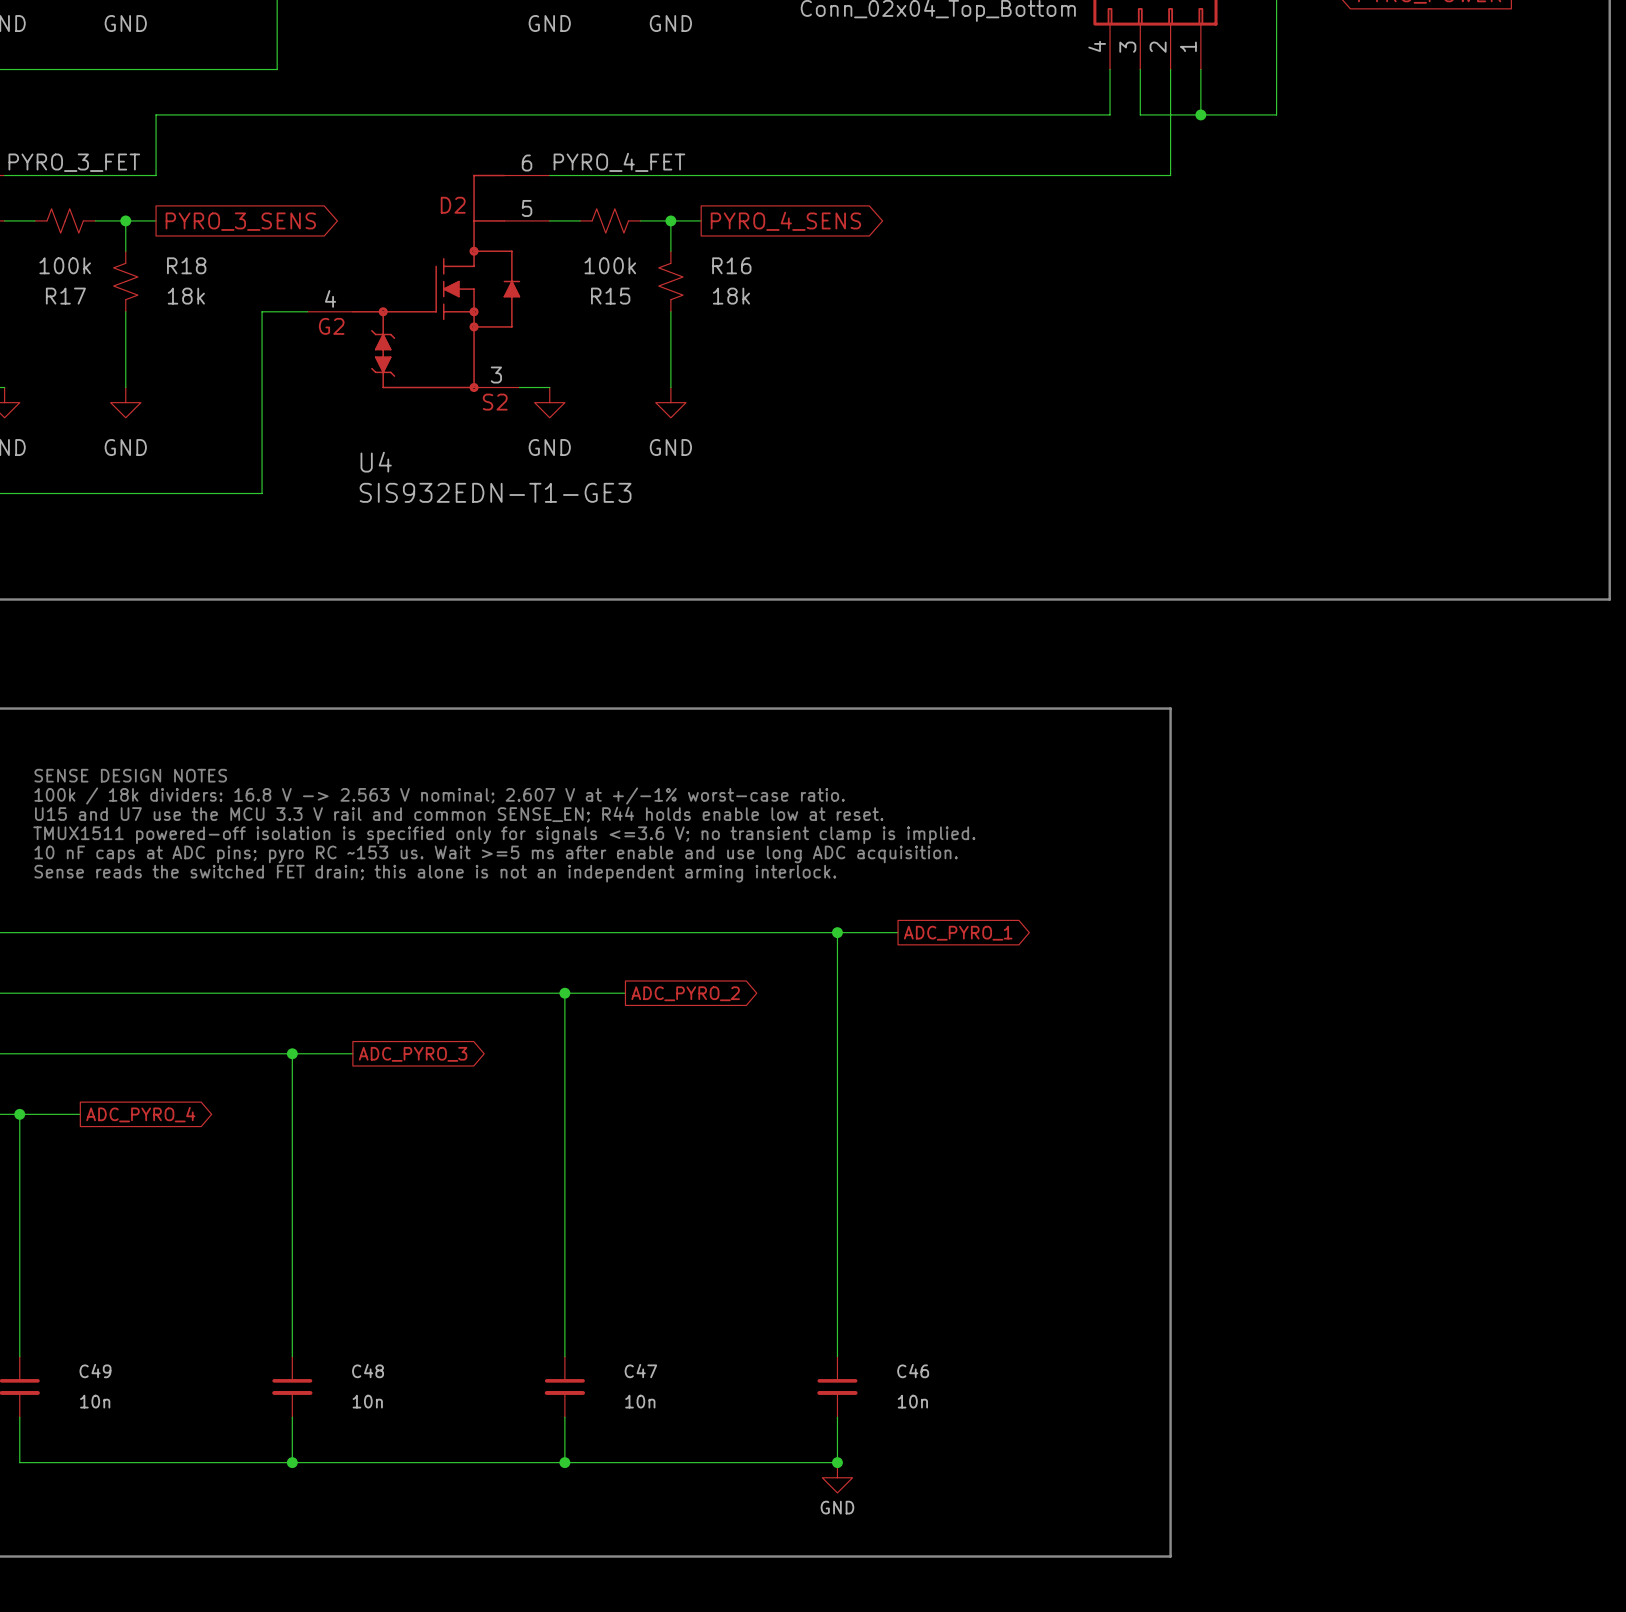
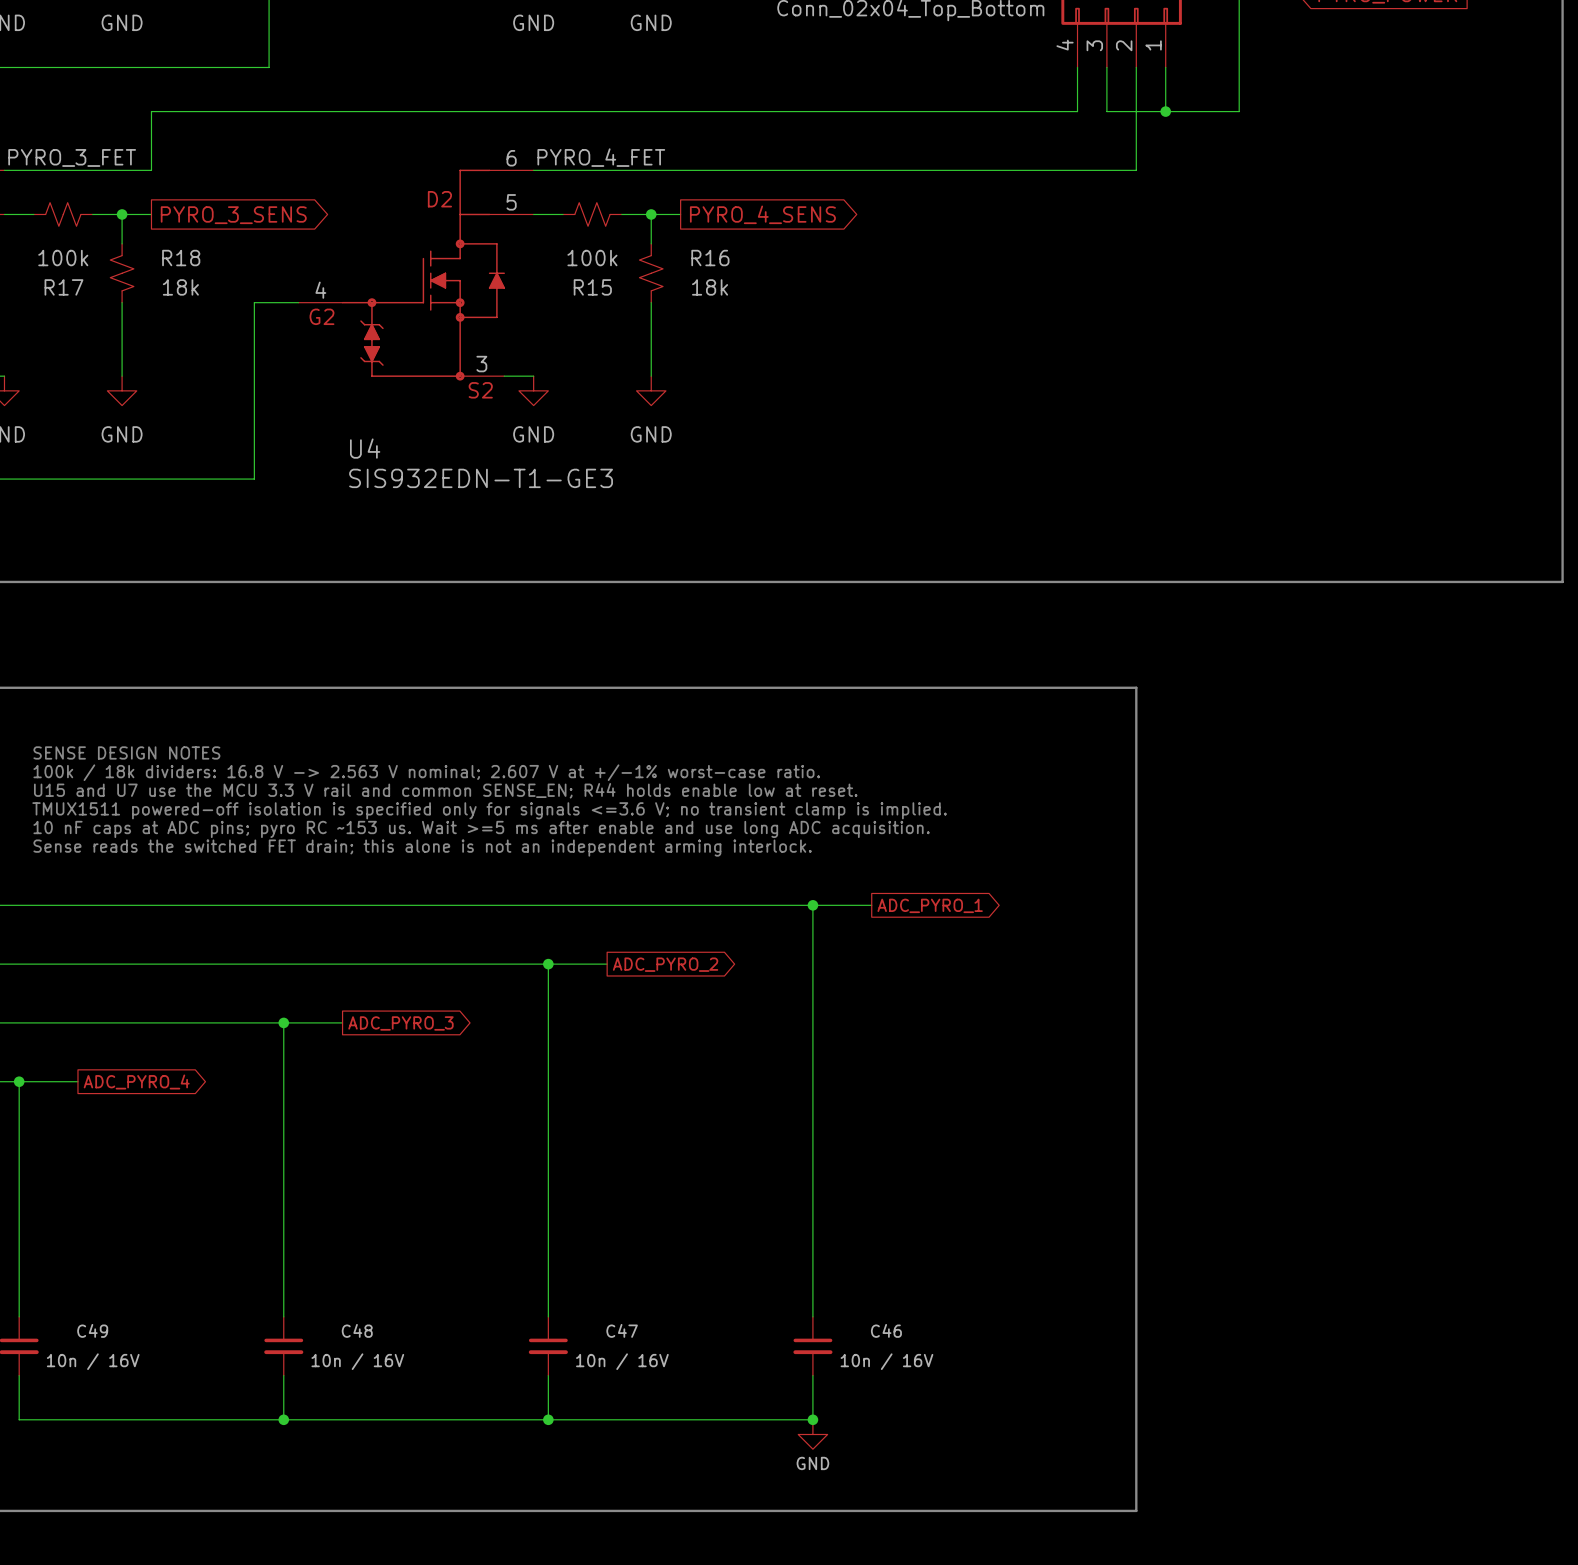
C49 value: 10n (95, 1401) -> 10n / 16V (93, 1361)
C48 value: 10n (367, 1401) -> 10n / 16V (357, 1361)
C47 value: 10n (640, 1401) -> 10n / 16V (622, 1361)
C46 value: 10n (912, 1401) -> 10n / 16V (886, 1361)

